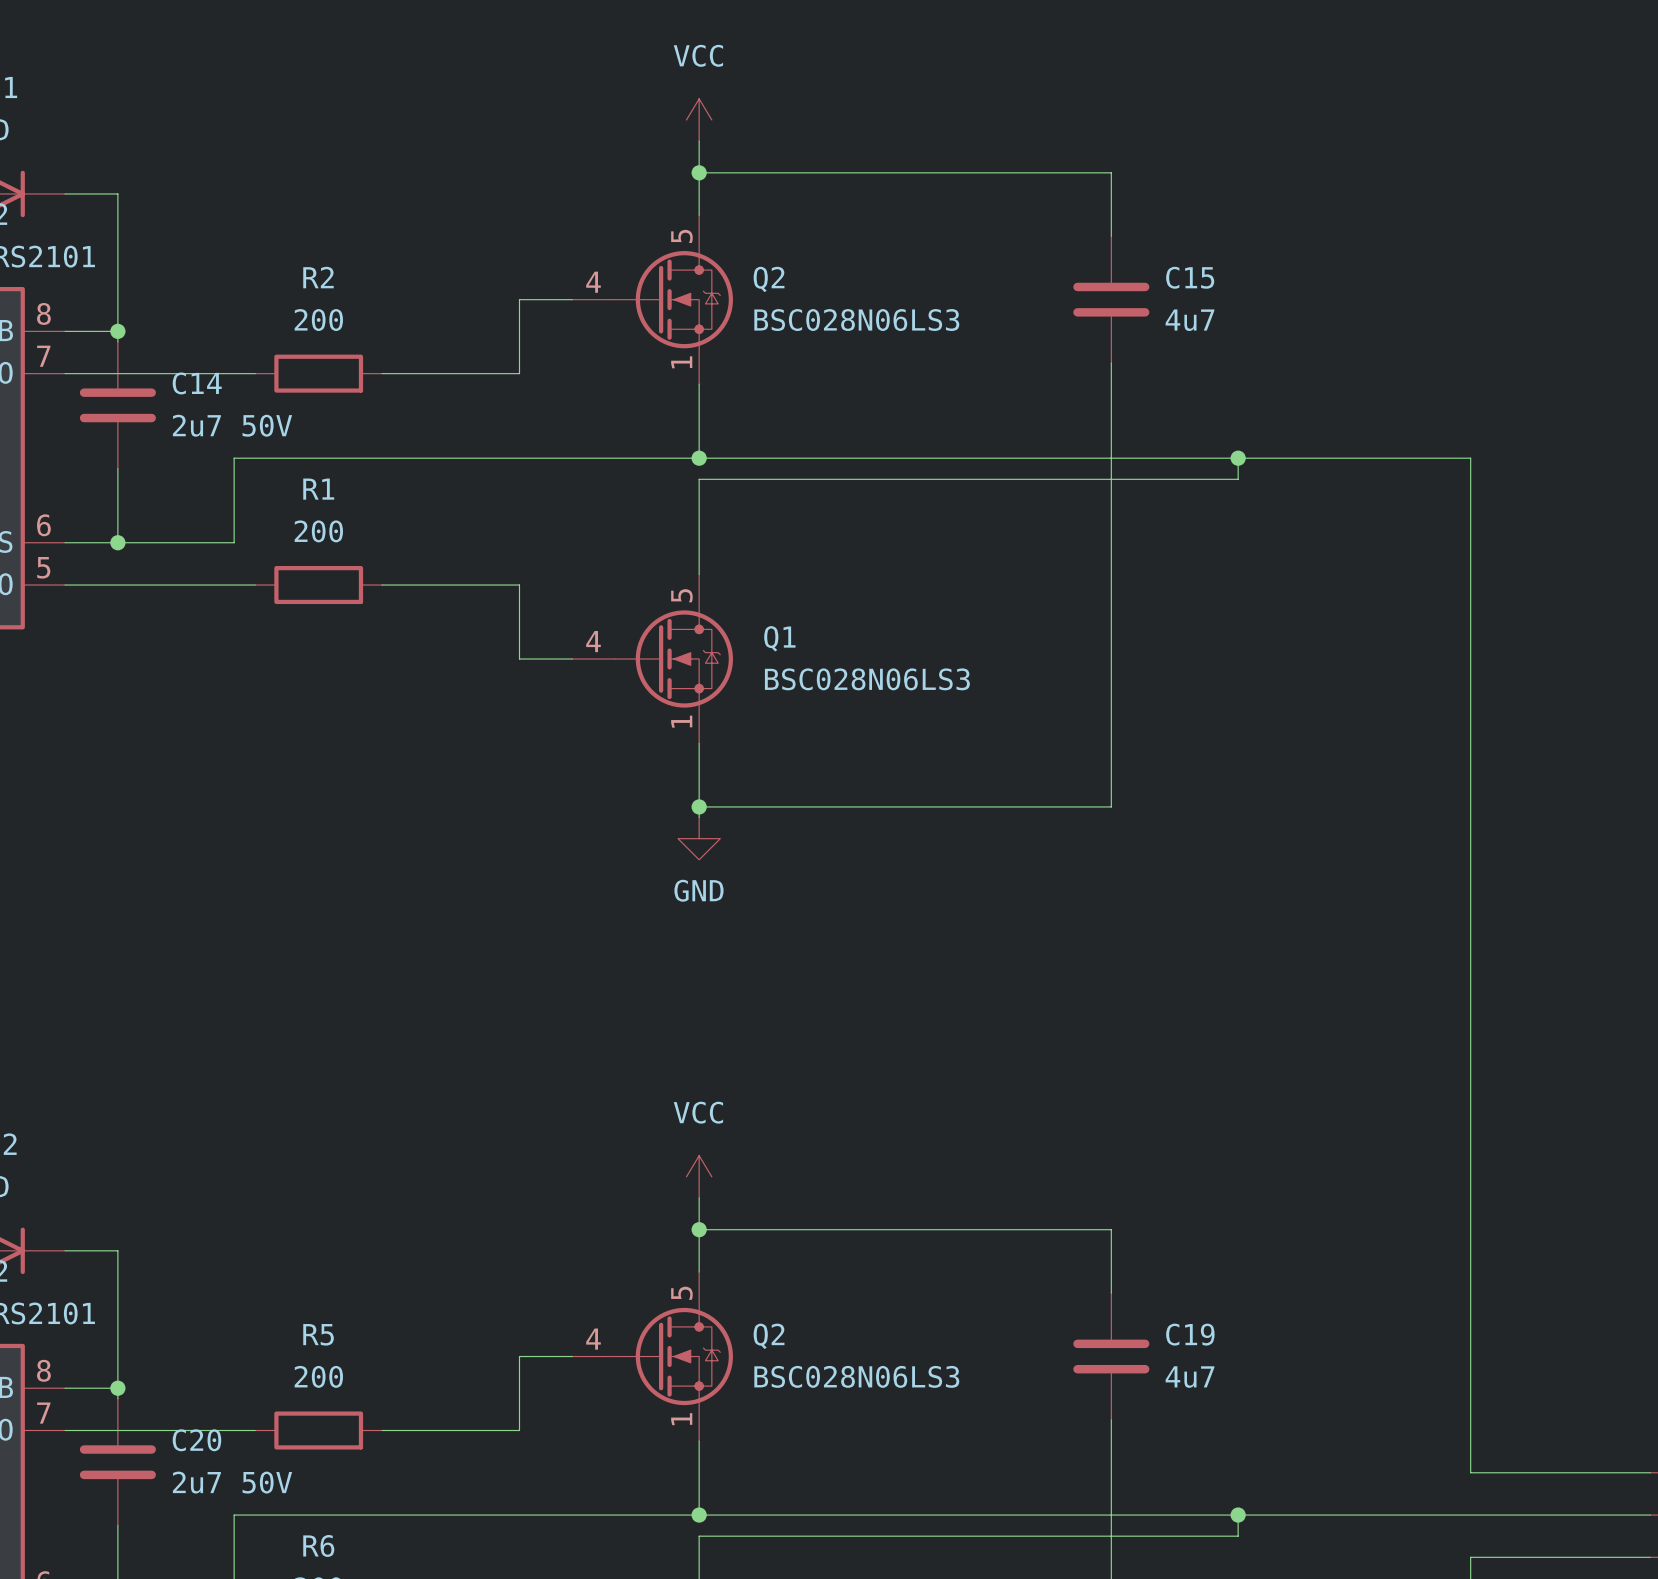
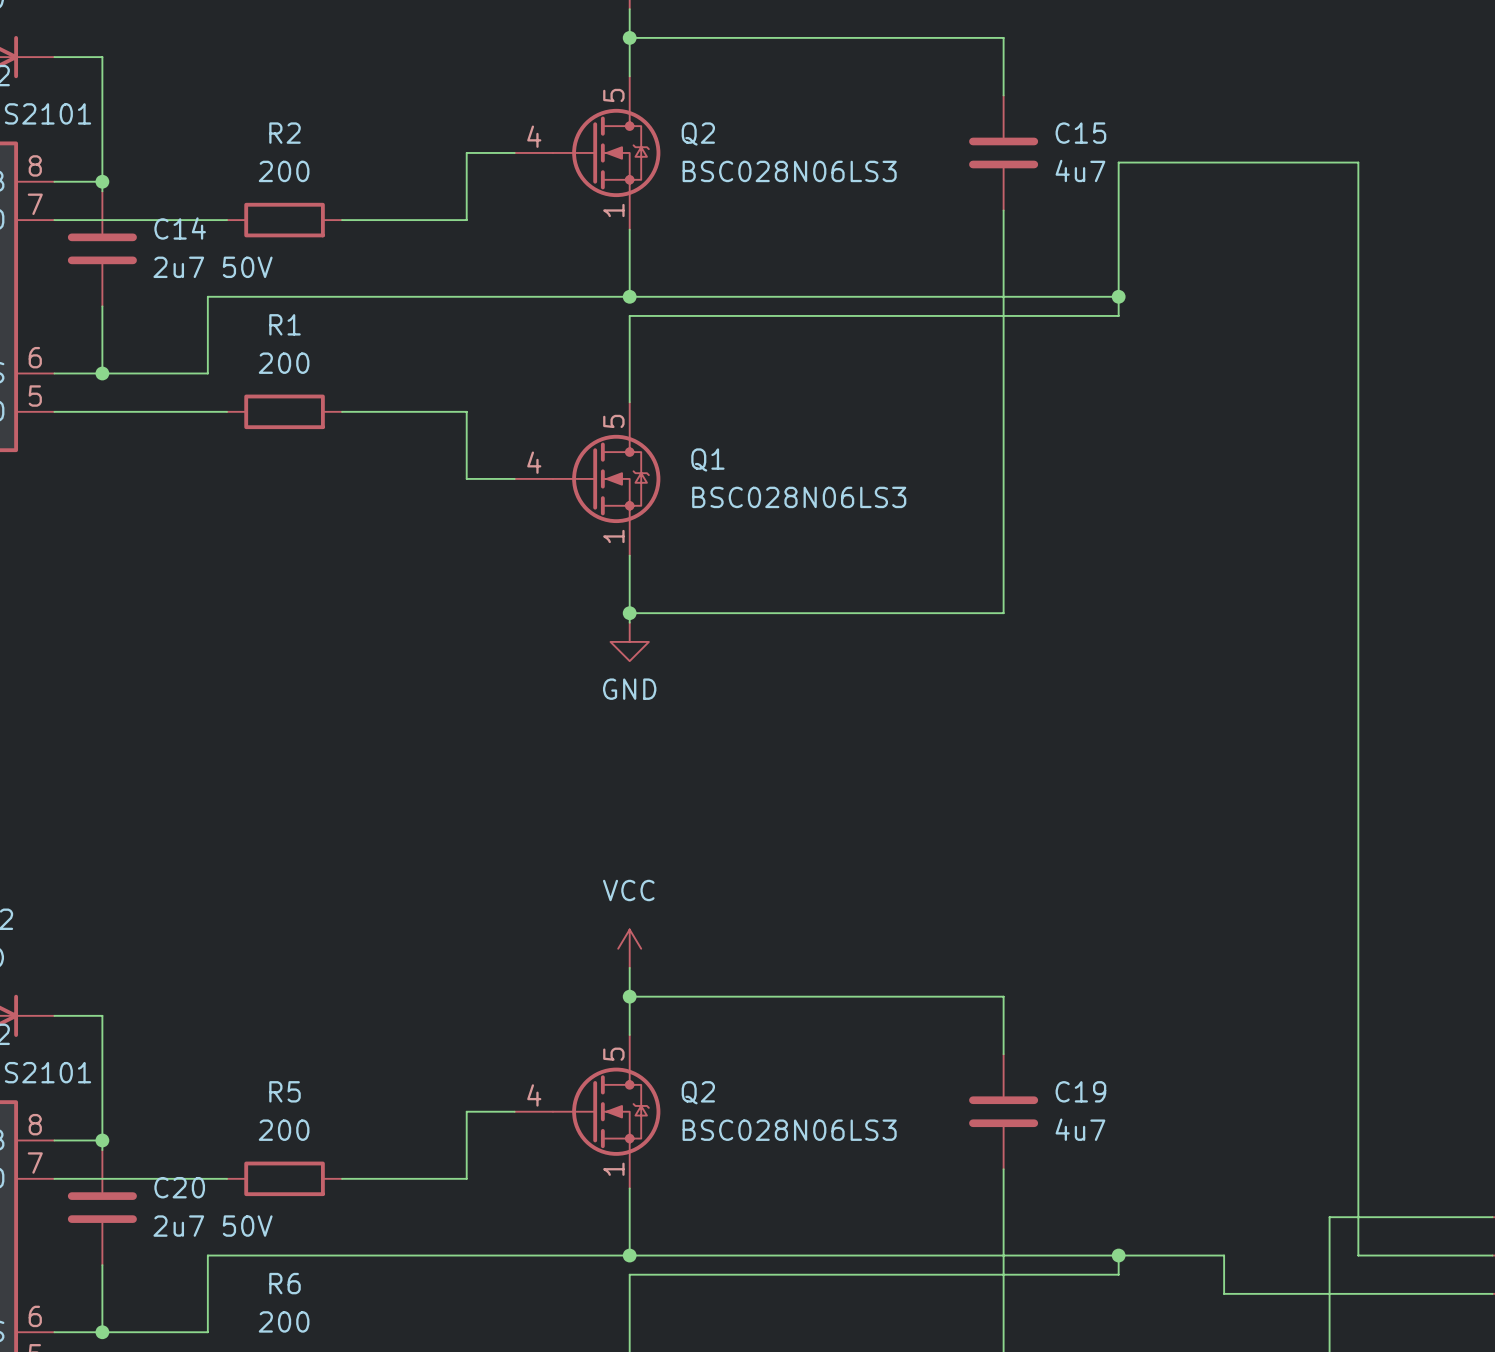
wire: (1238, 458) (1470, 458) (1470, 1472) -> (1118, 296) (1118, 162) (1358, 162) (1358, 1255)
wire: (1354, 1515) (1502, 1515) -> (1224, 1255) (1224, 1293) (1329, 1293) (1329, 1217)

